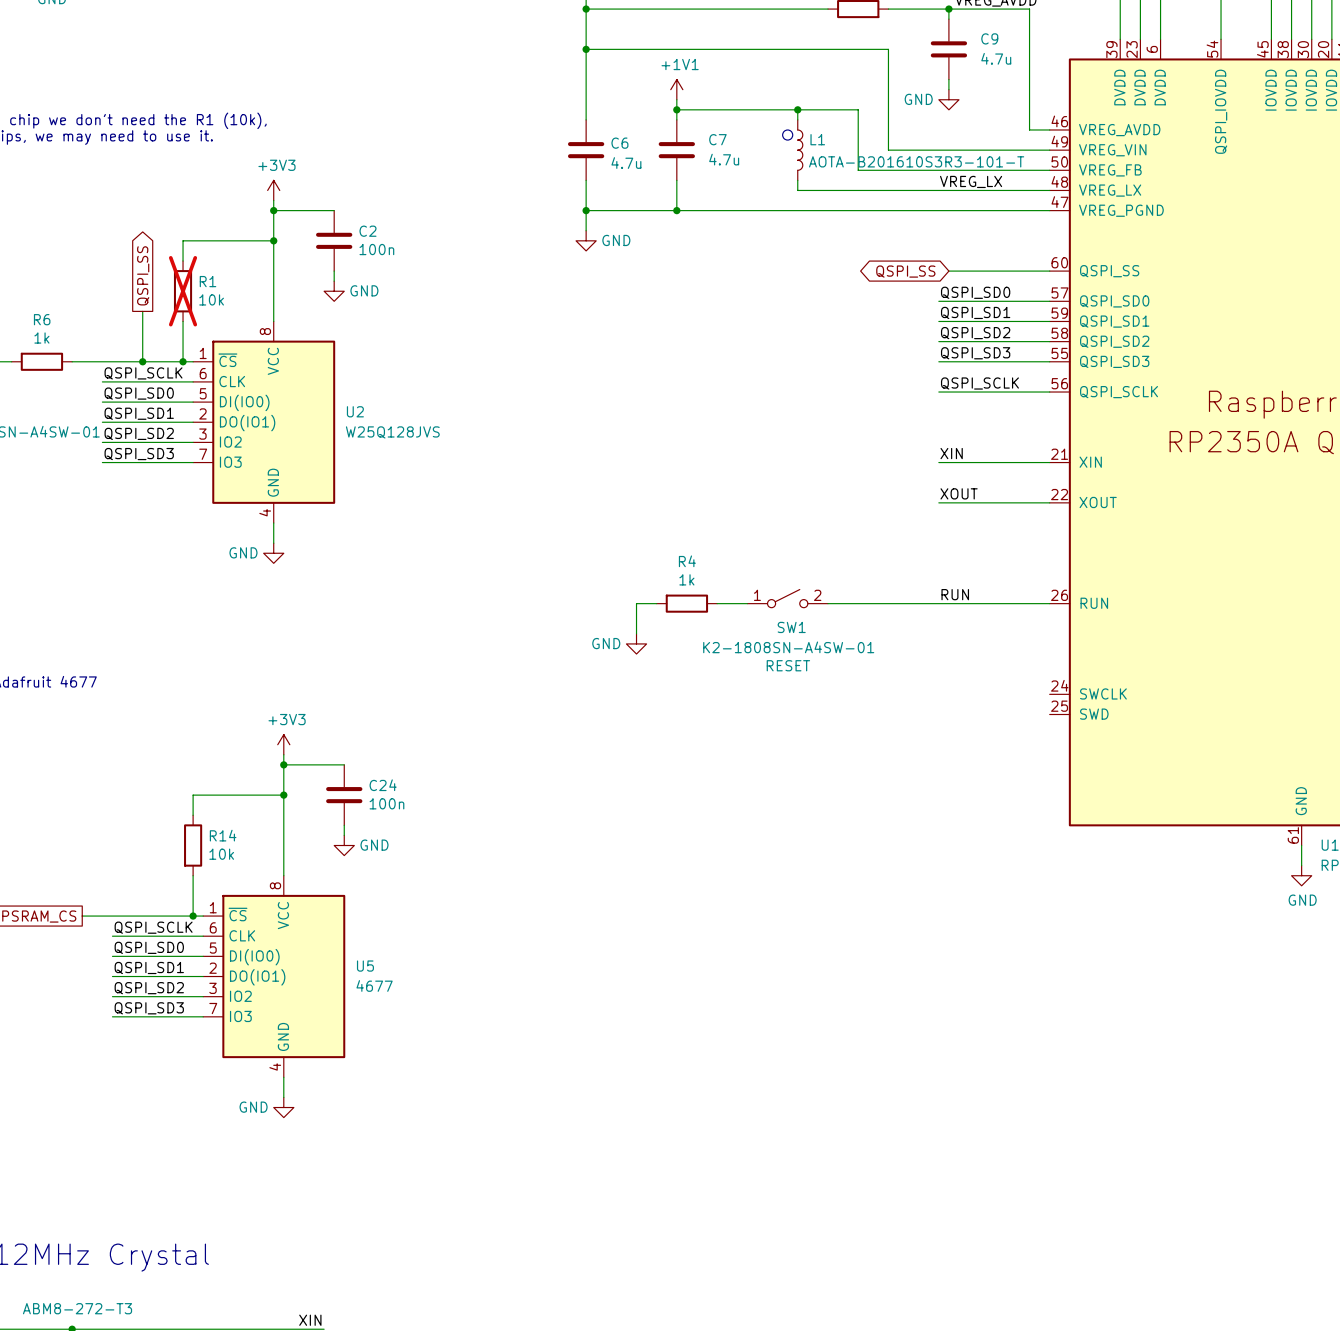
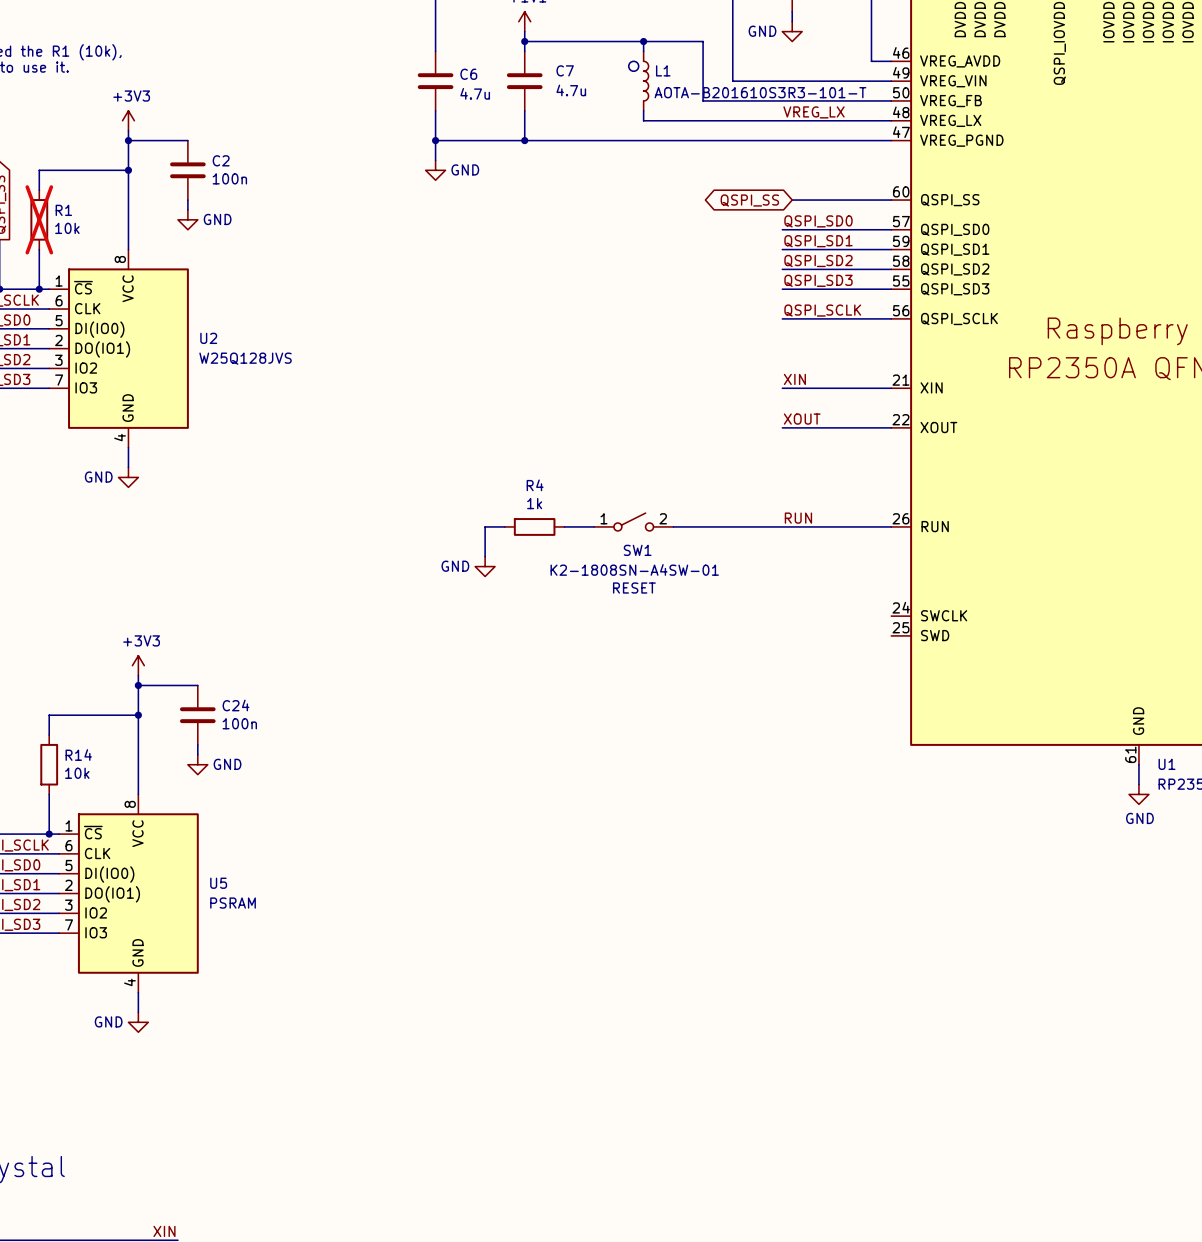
U5 value: 4677 (374, 985) -> PSRAM (233, 903)

